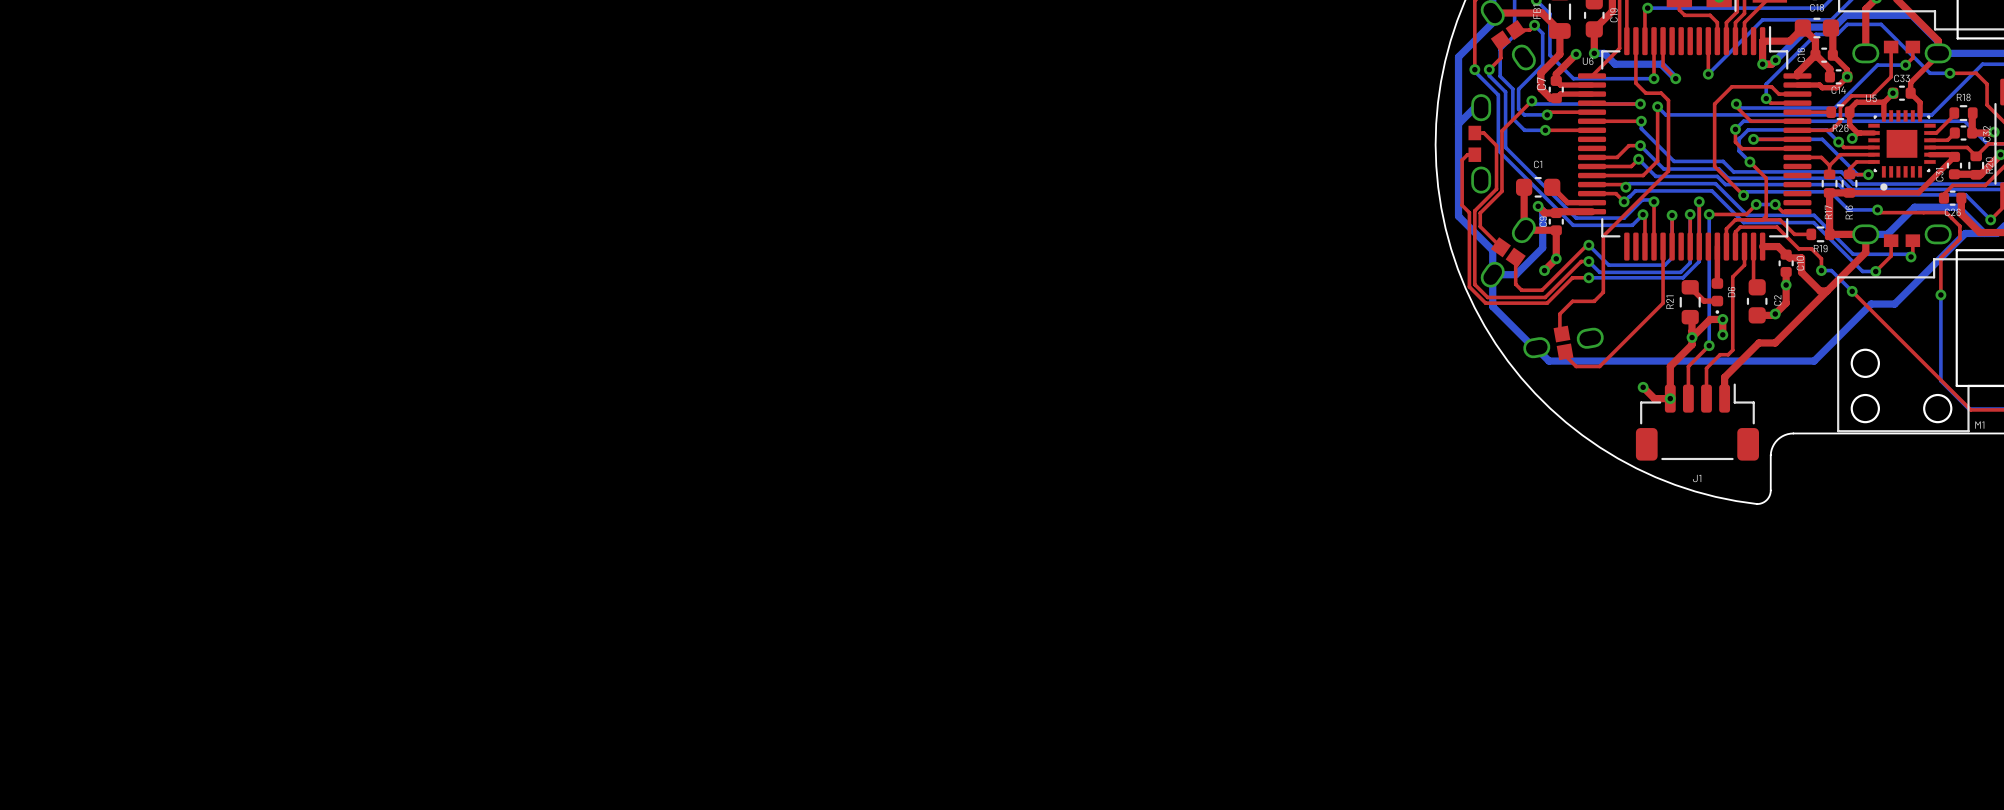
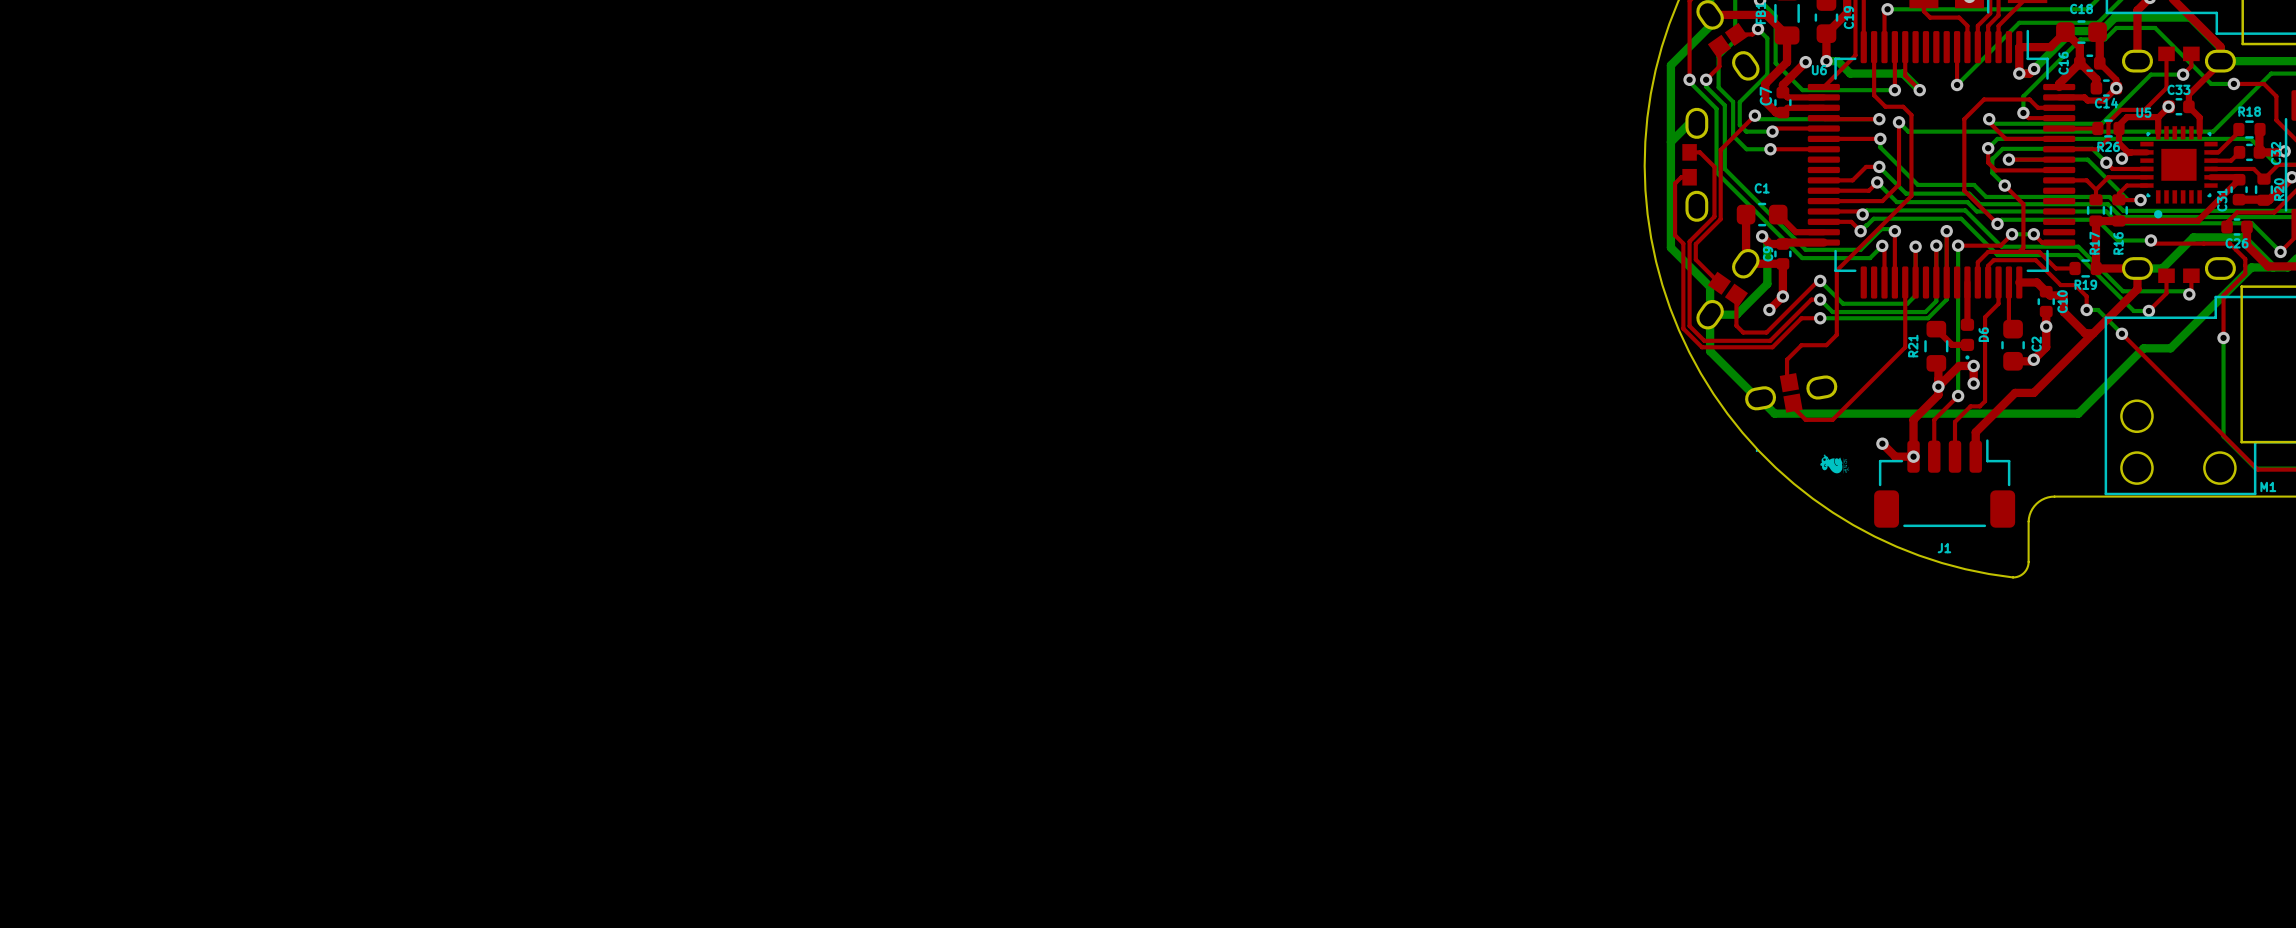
part: none -> (1834, 466)

